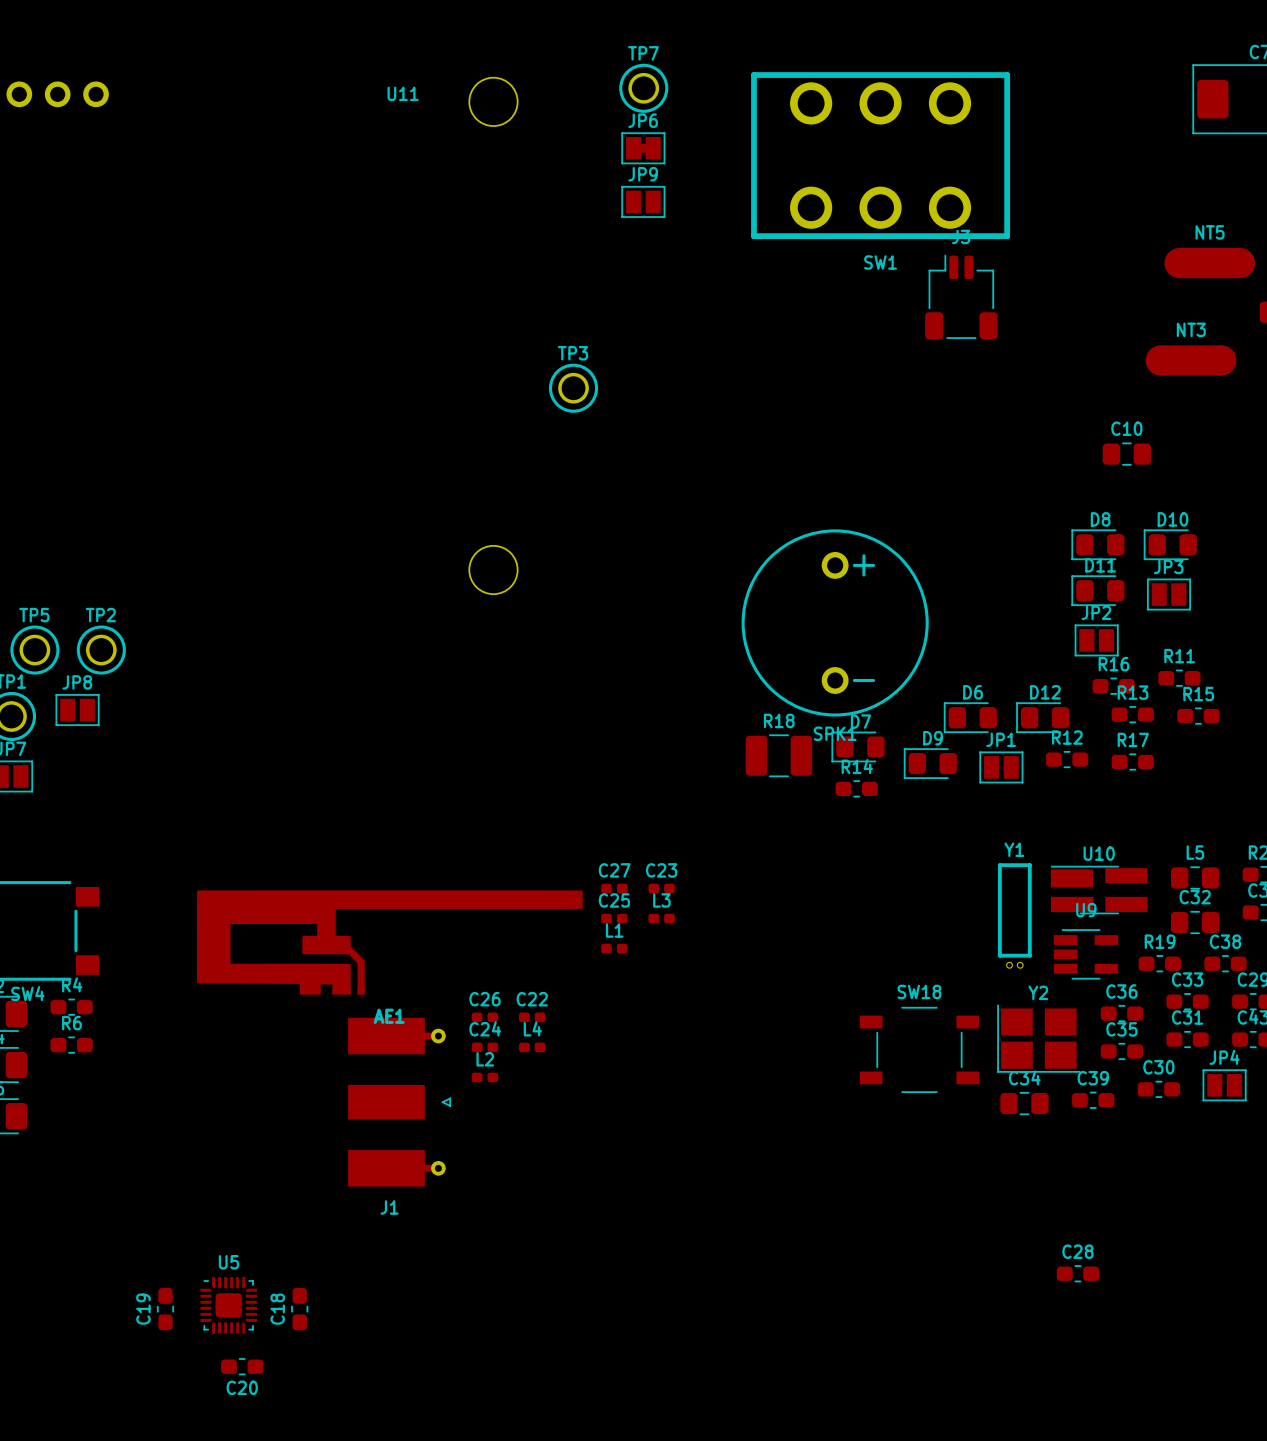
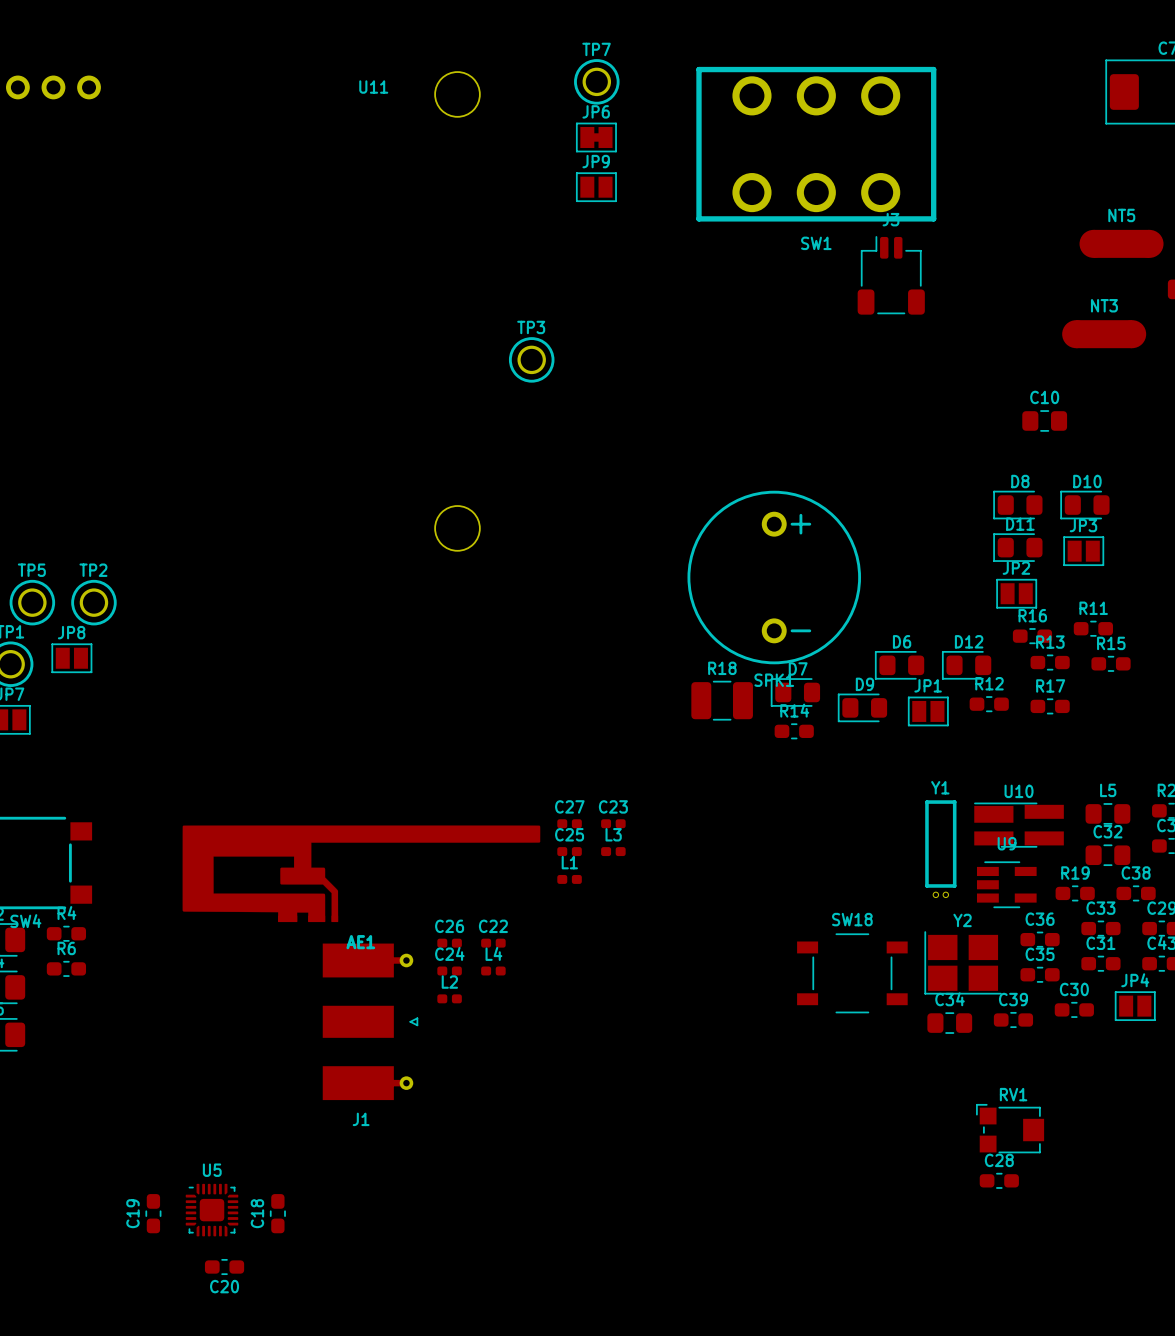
RV1: none -> (1010, 1128)

